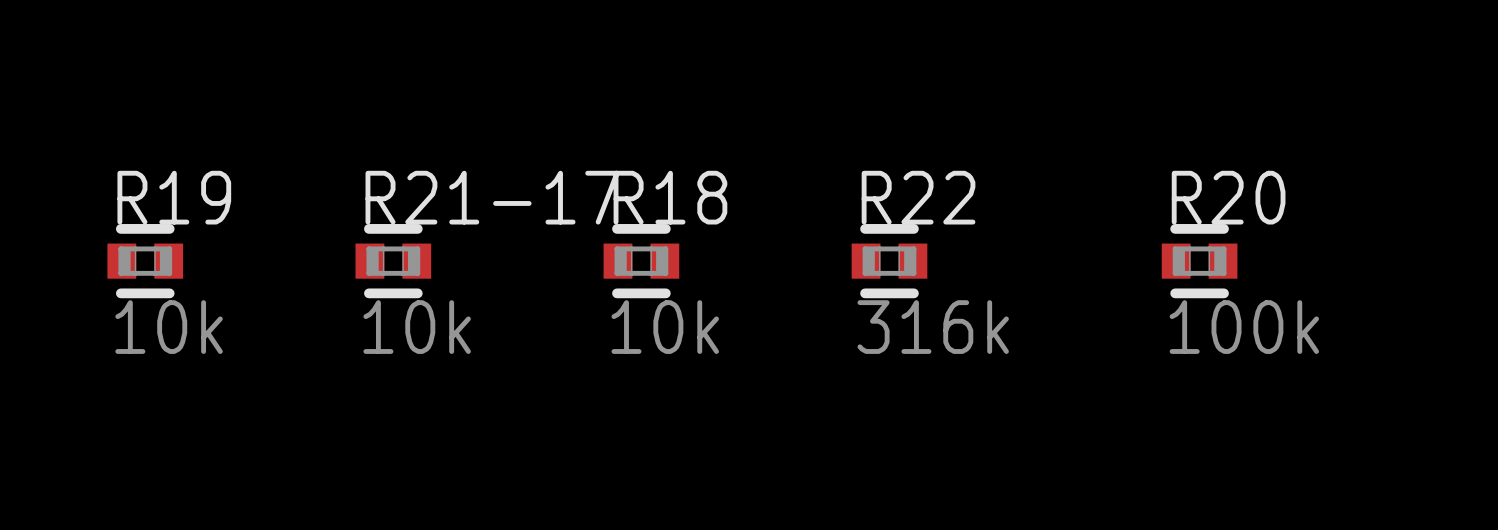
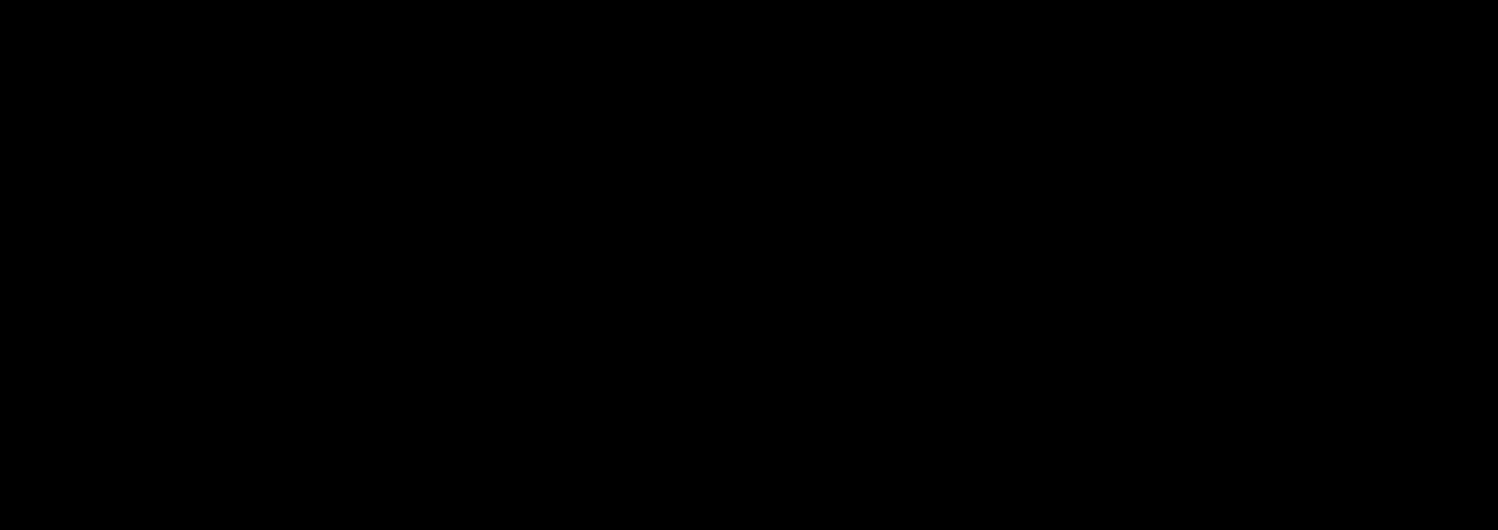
R19: 10k (145, 261) -> none
R21-17: 10k (393, 261) -> none
R18: 10k (641, 261) -> none
R22: 316k (889, 261) -> none
R20: 100k (1199, 261) -> none

